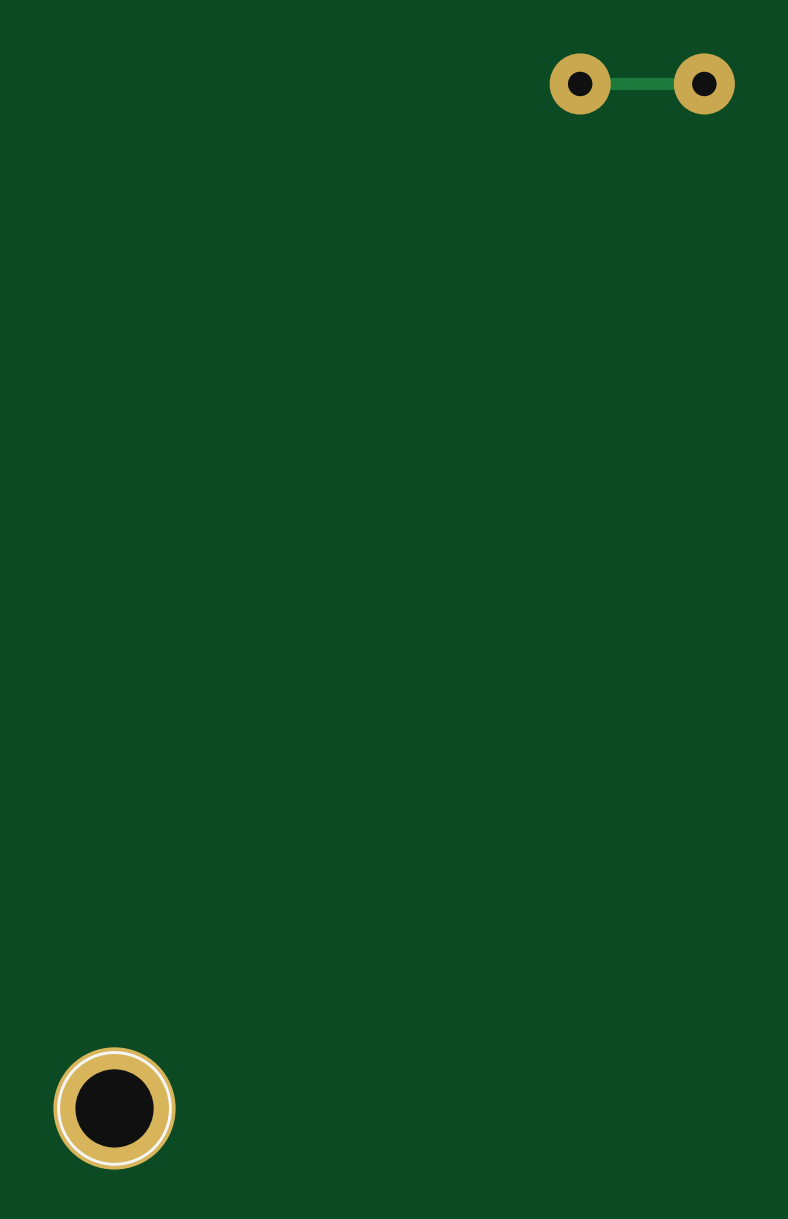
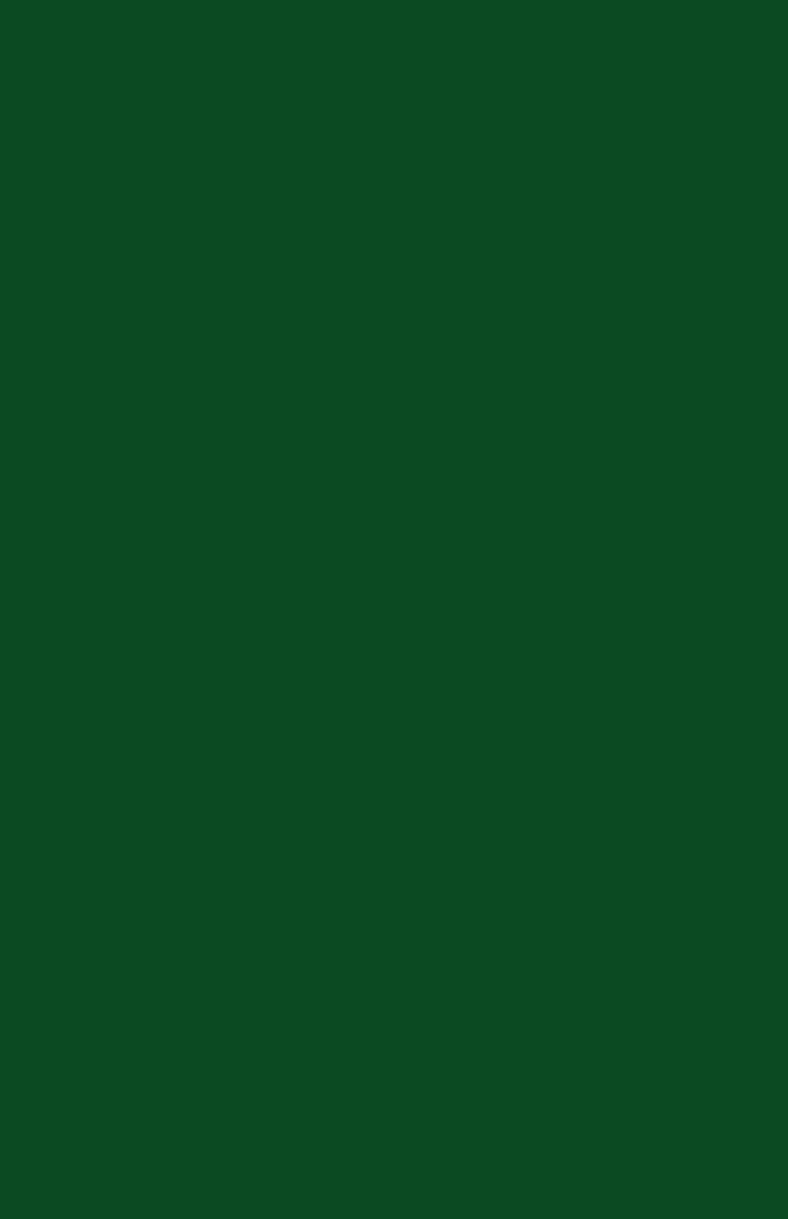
track: (580, 83) (704, 83) -> none
via: (580, 83) -> none
via: (704, 83) -> none
part: (114, 1108) -> none

